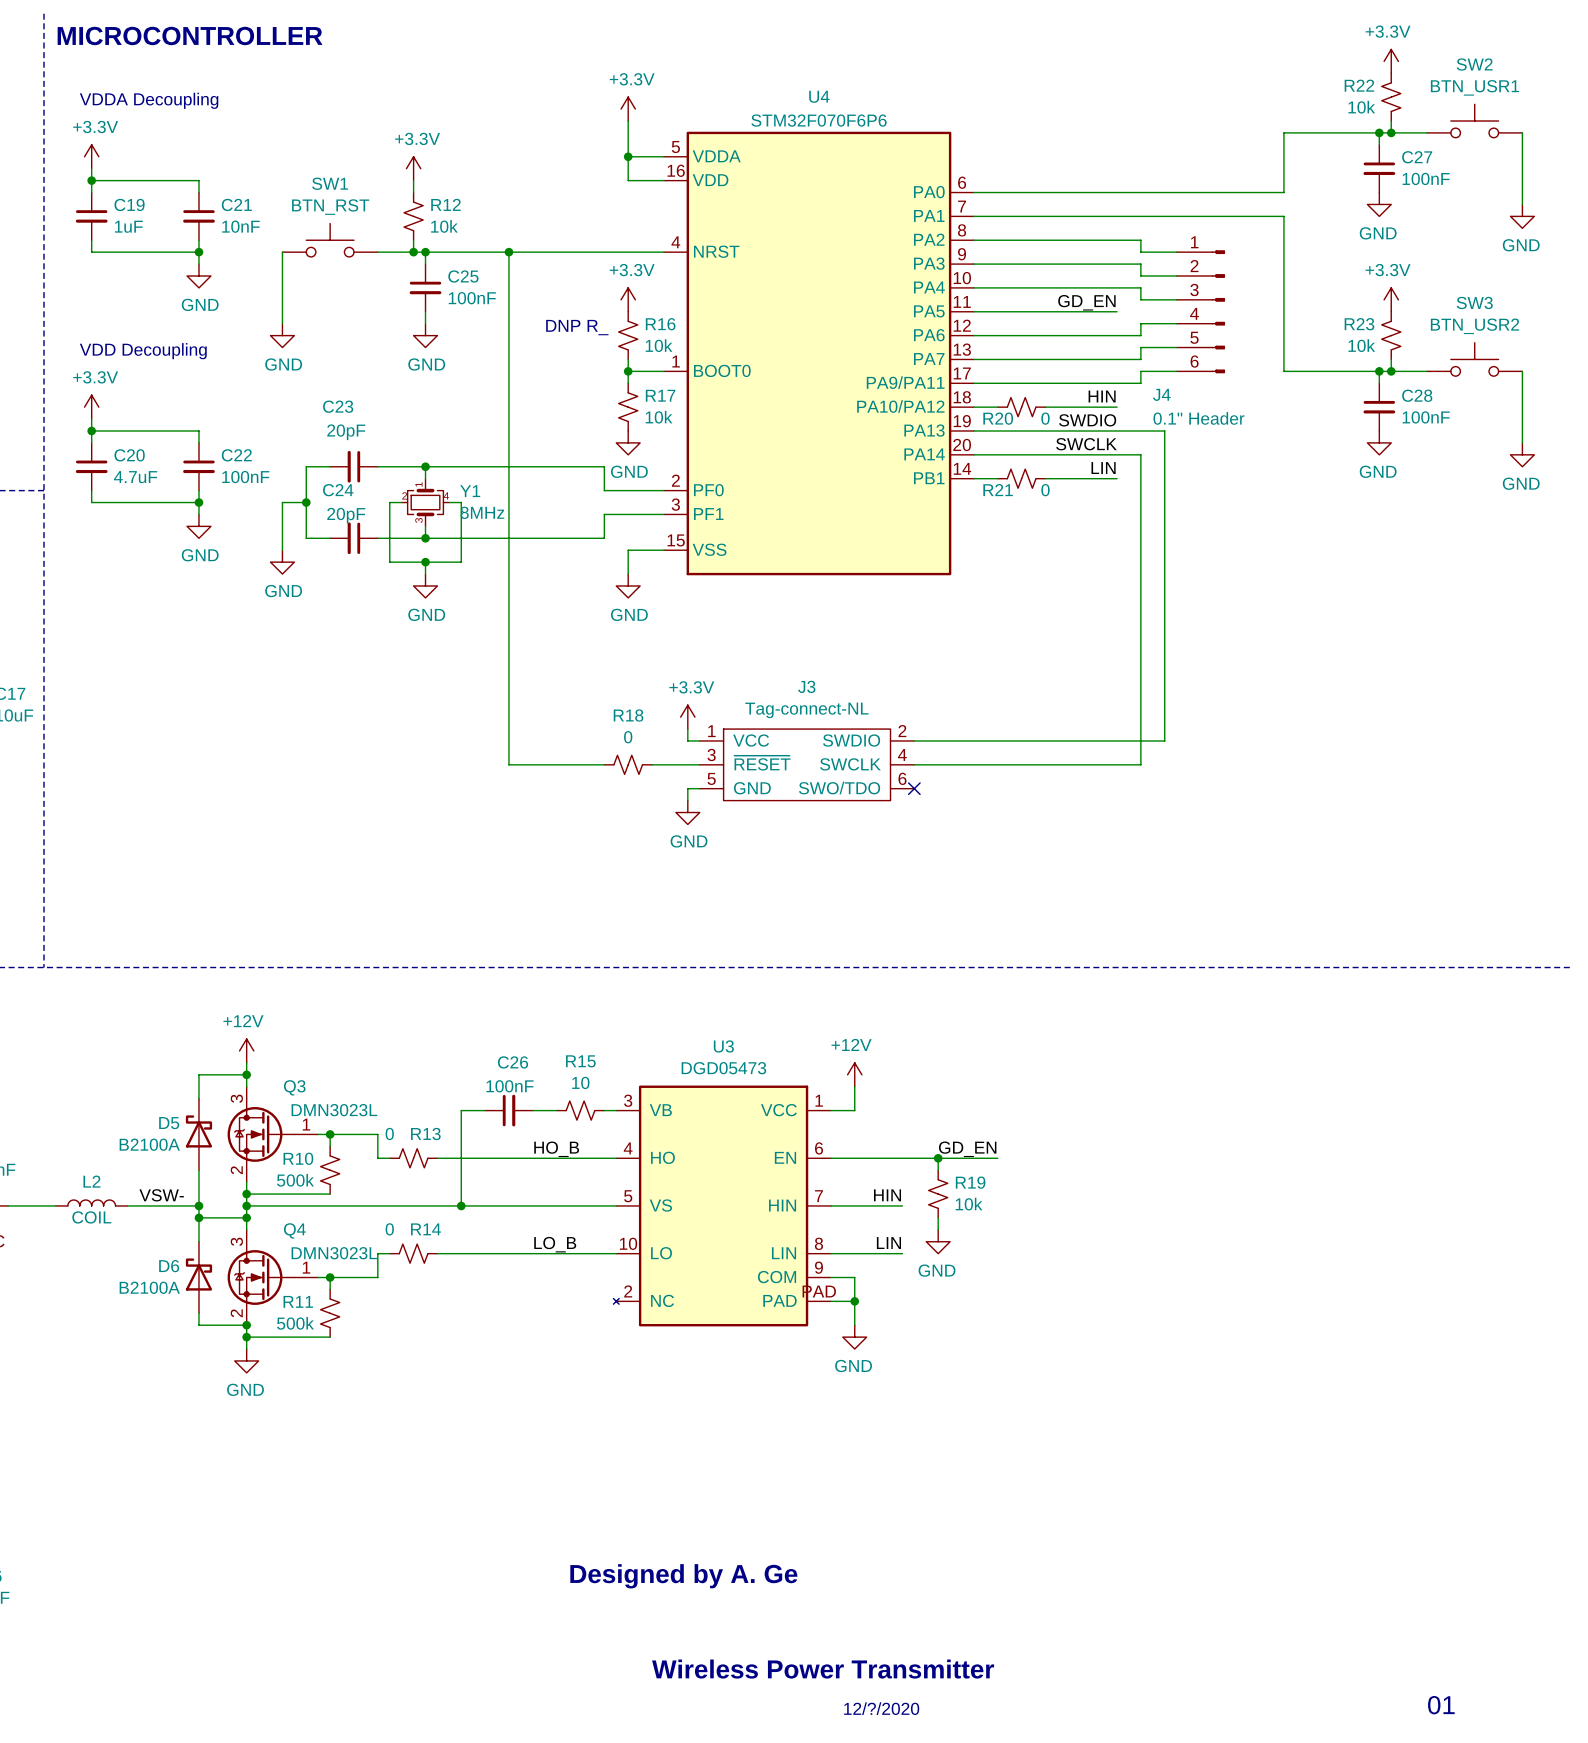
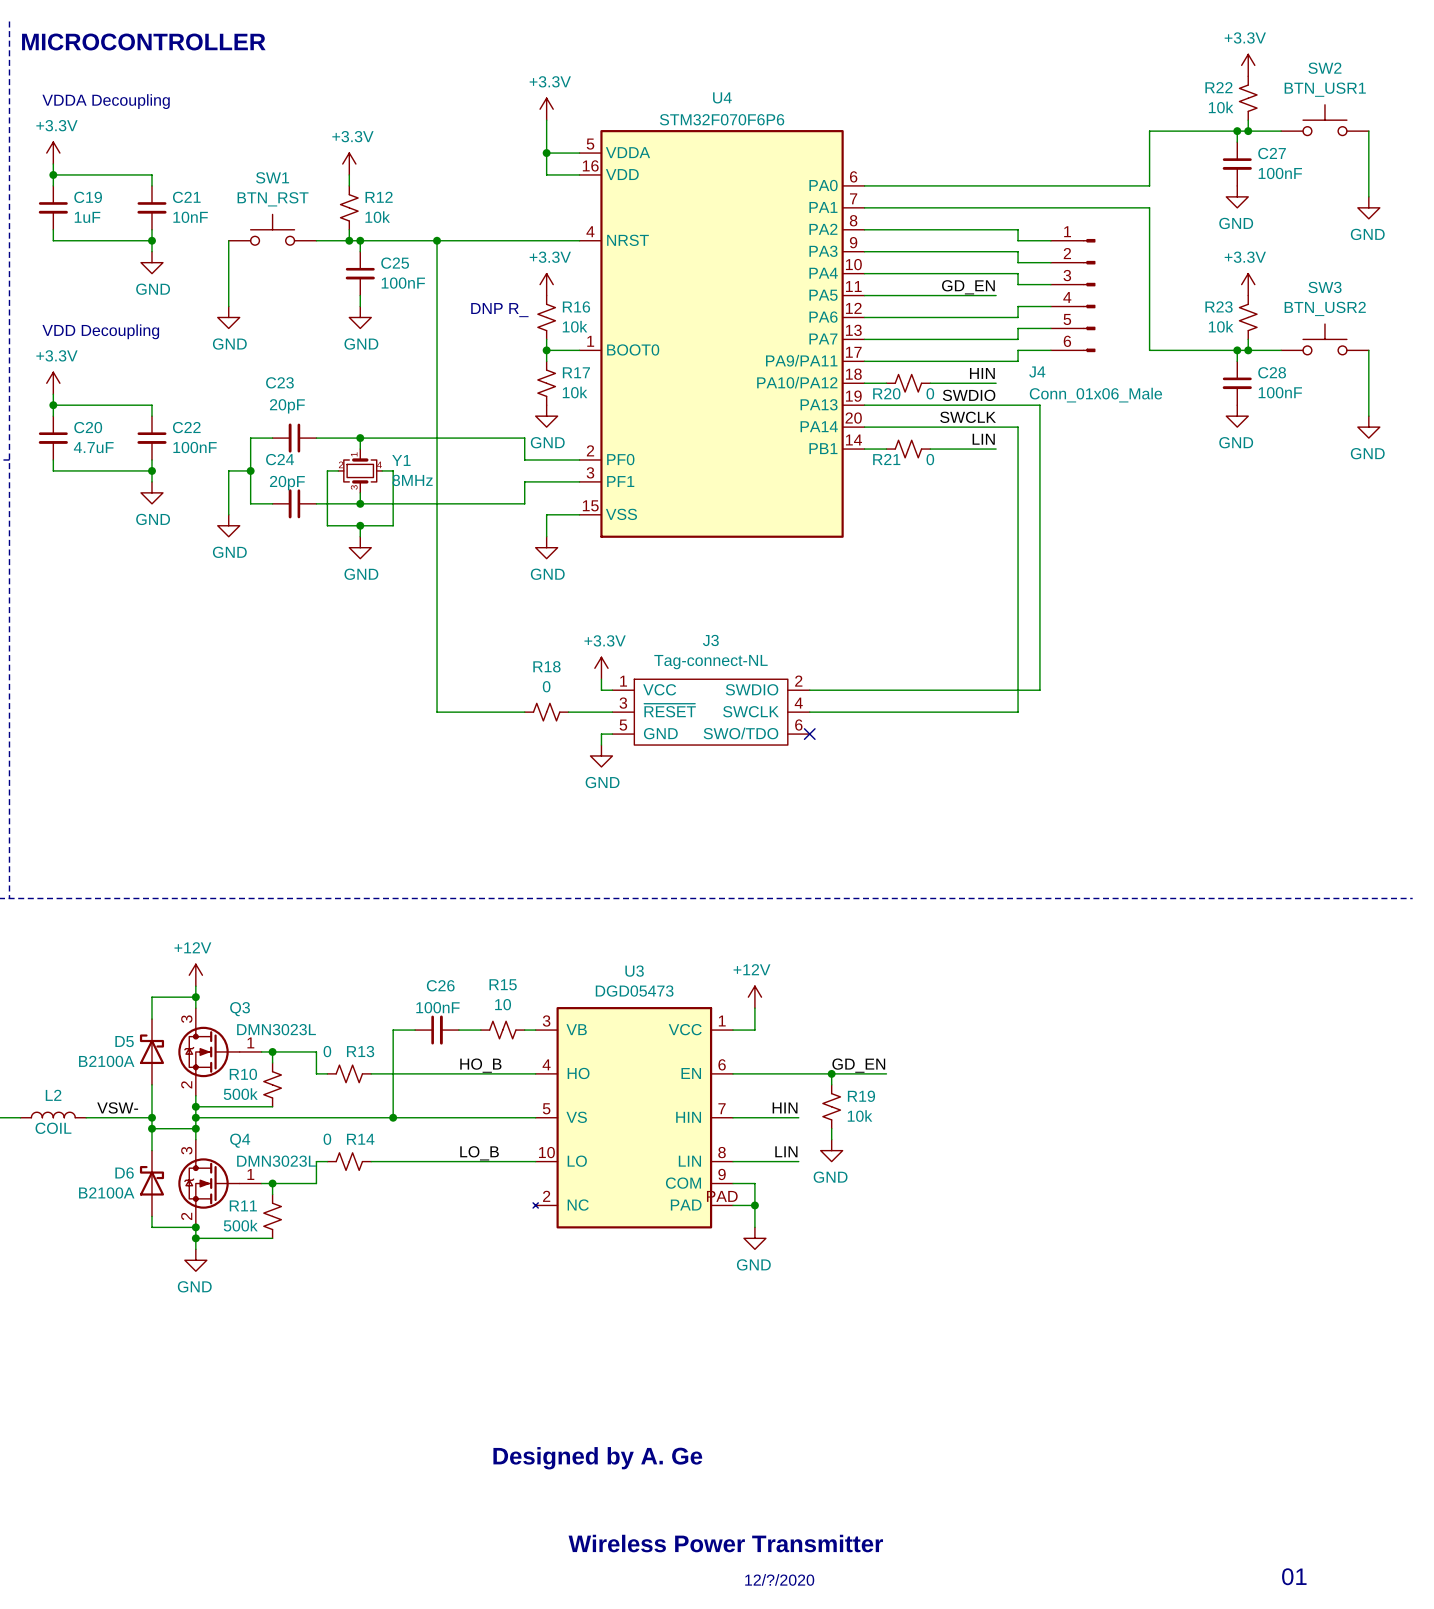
J4 value: 0.1" Header (1198, 418) -> Conn_01x06_Male (1095, 395)

